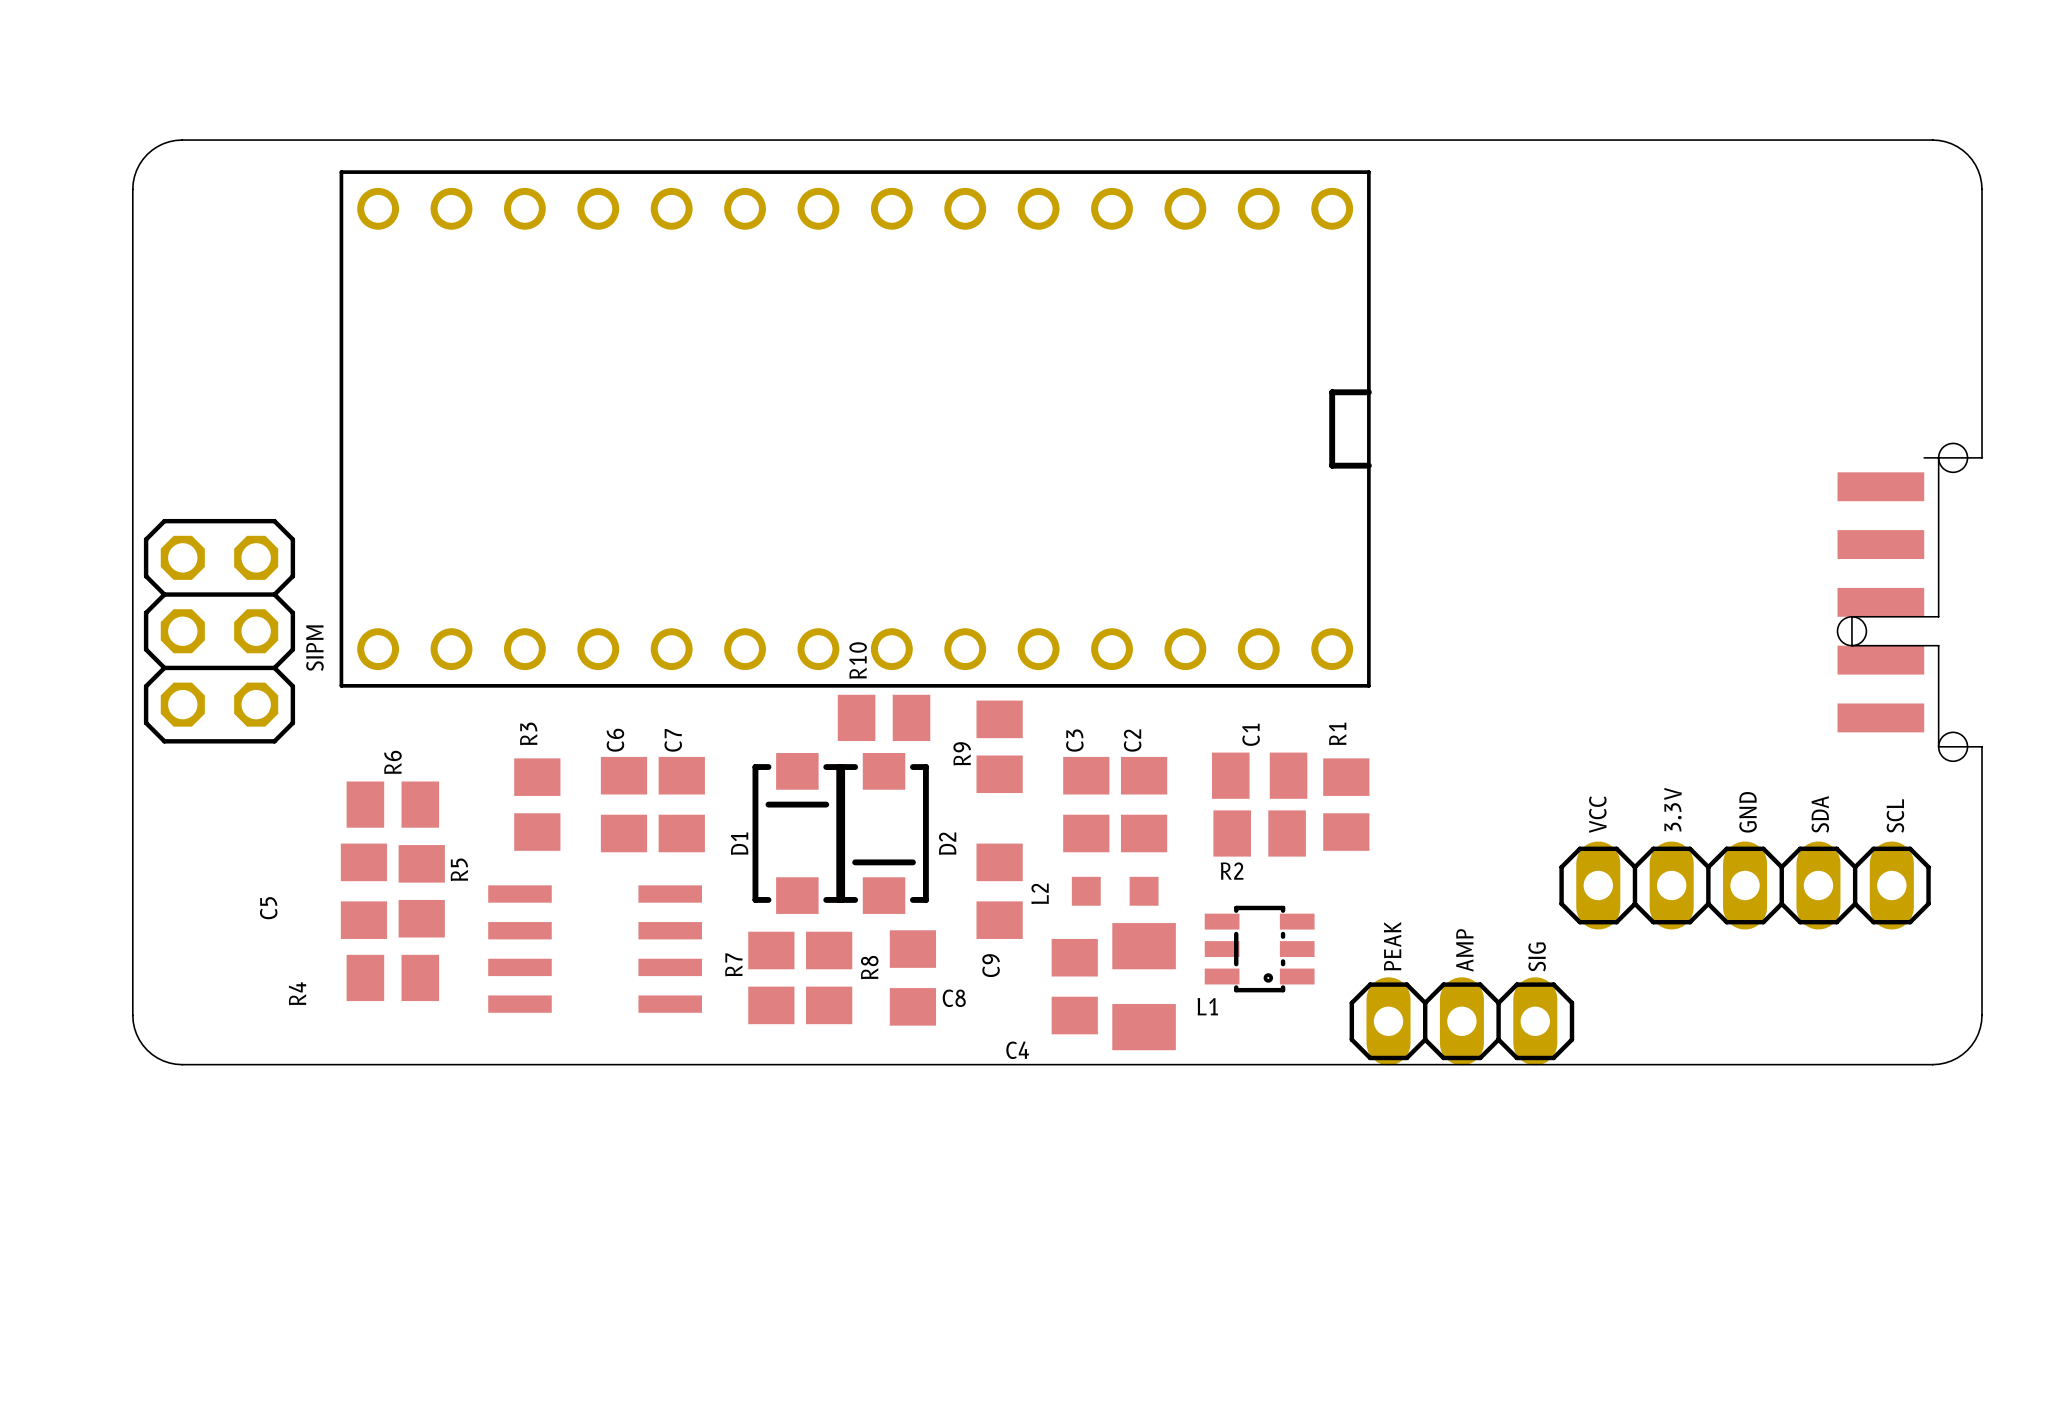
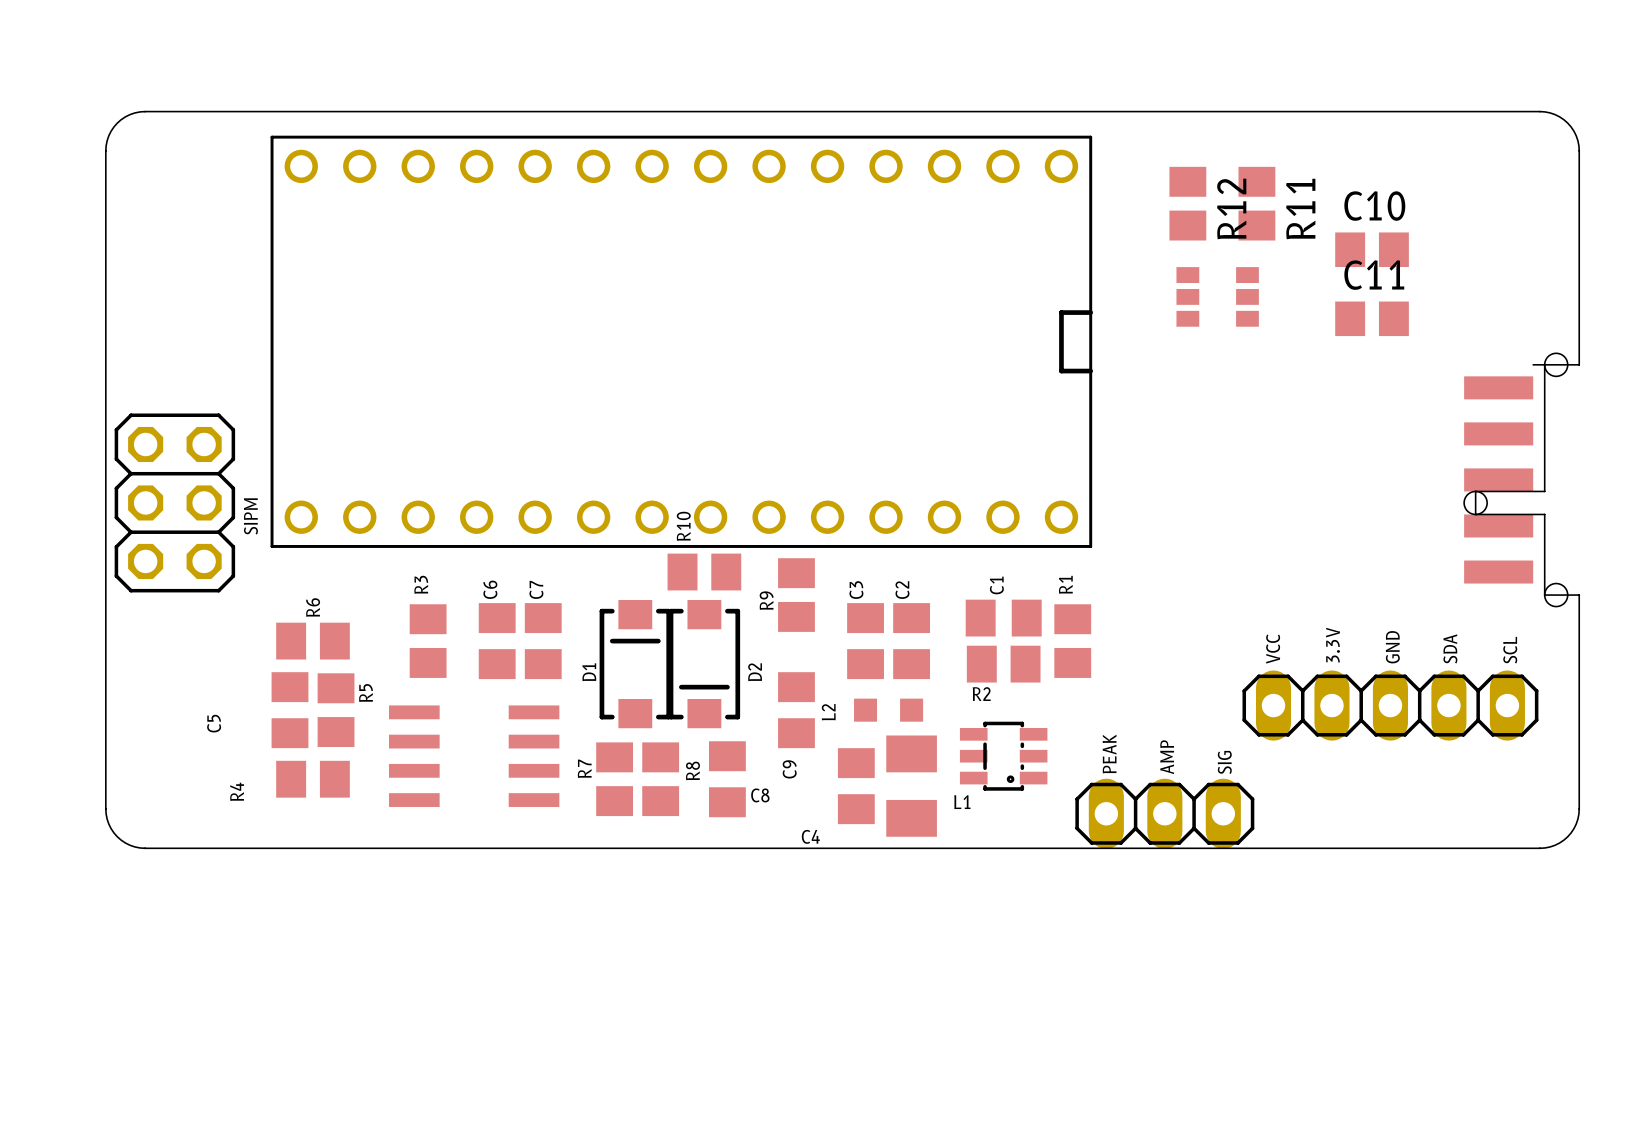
R12: none -> (1187, 203)
R11: none -> (1256, 203)
C10: none -> (1372, 249)
part: none -> (1217, 296)
C11: none -> (1372, 318)

